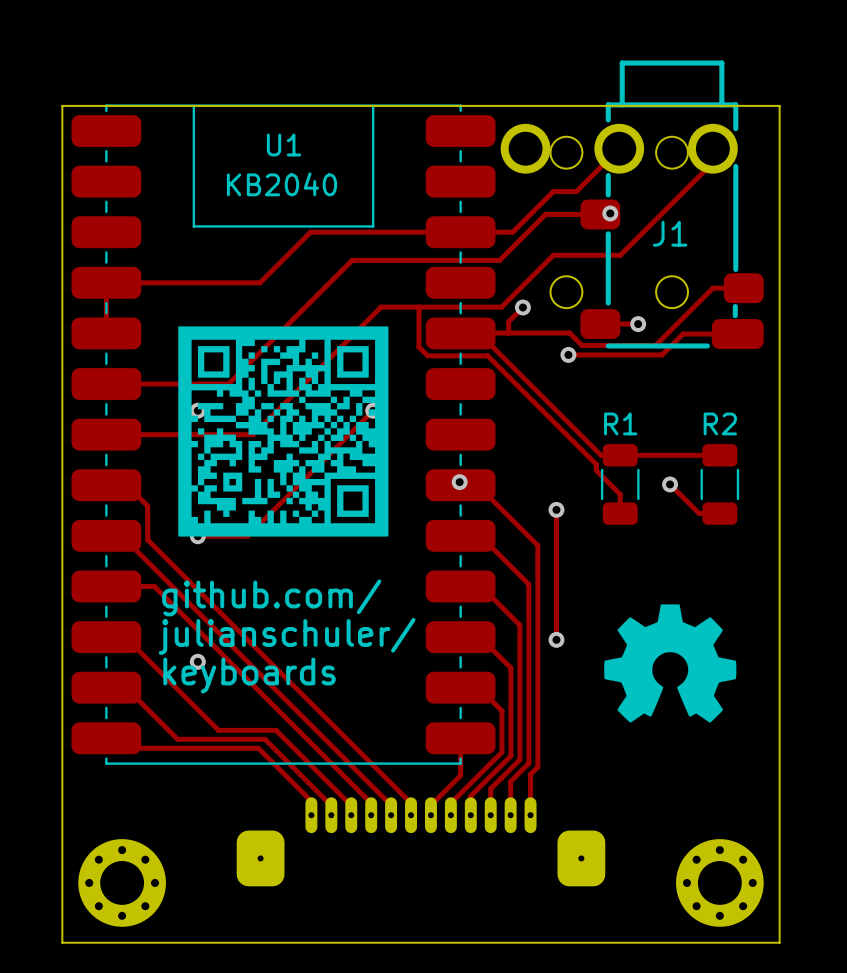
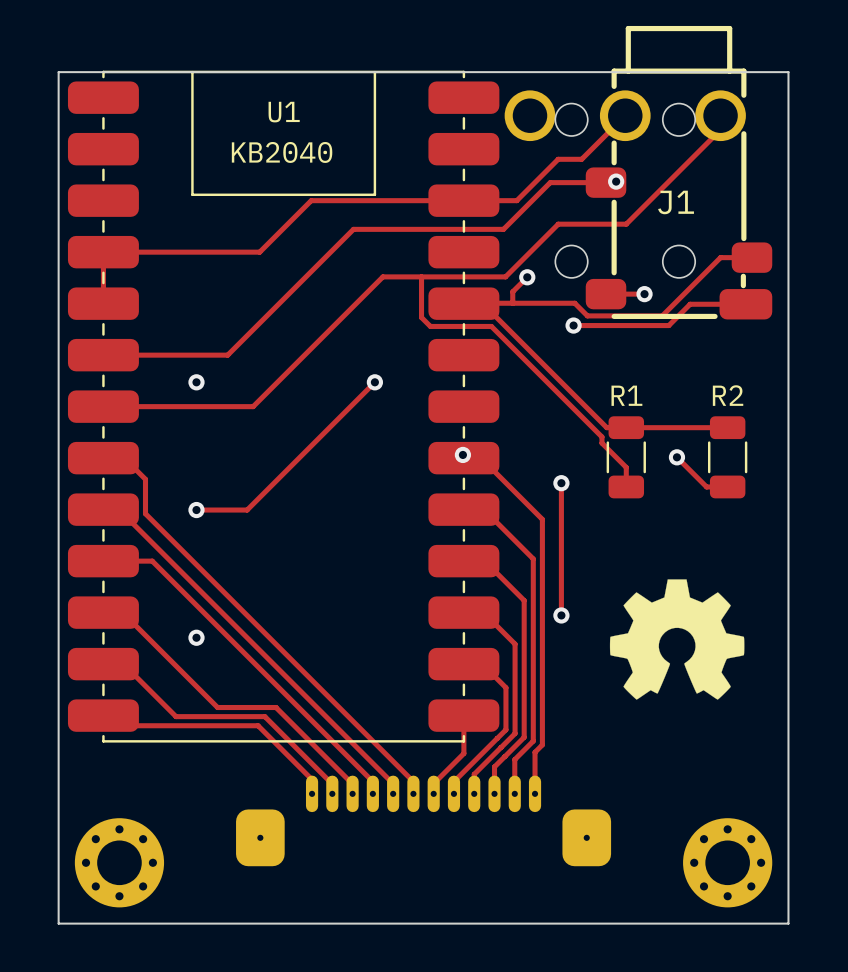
drawing: [178, 326, 389, 537] -> none
text: github.com/ (271, 597) -> none
text: julianschuler/ (287, 636) -> none
text: keyboards (249, 675) -> none

